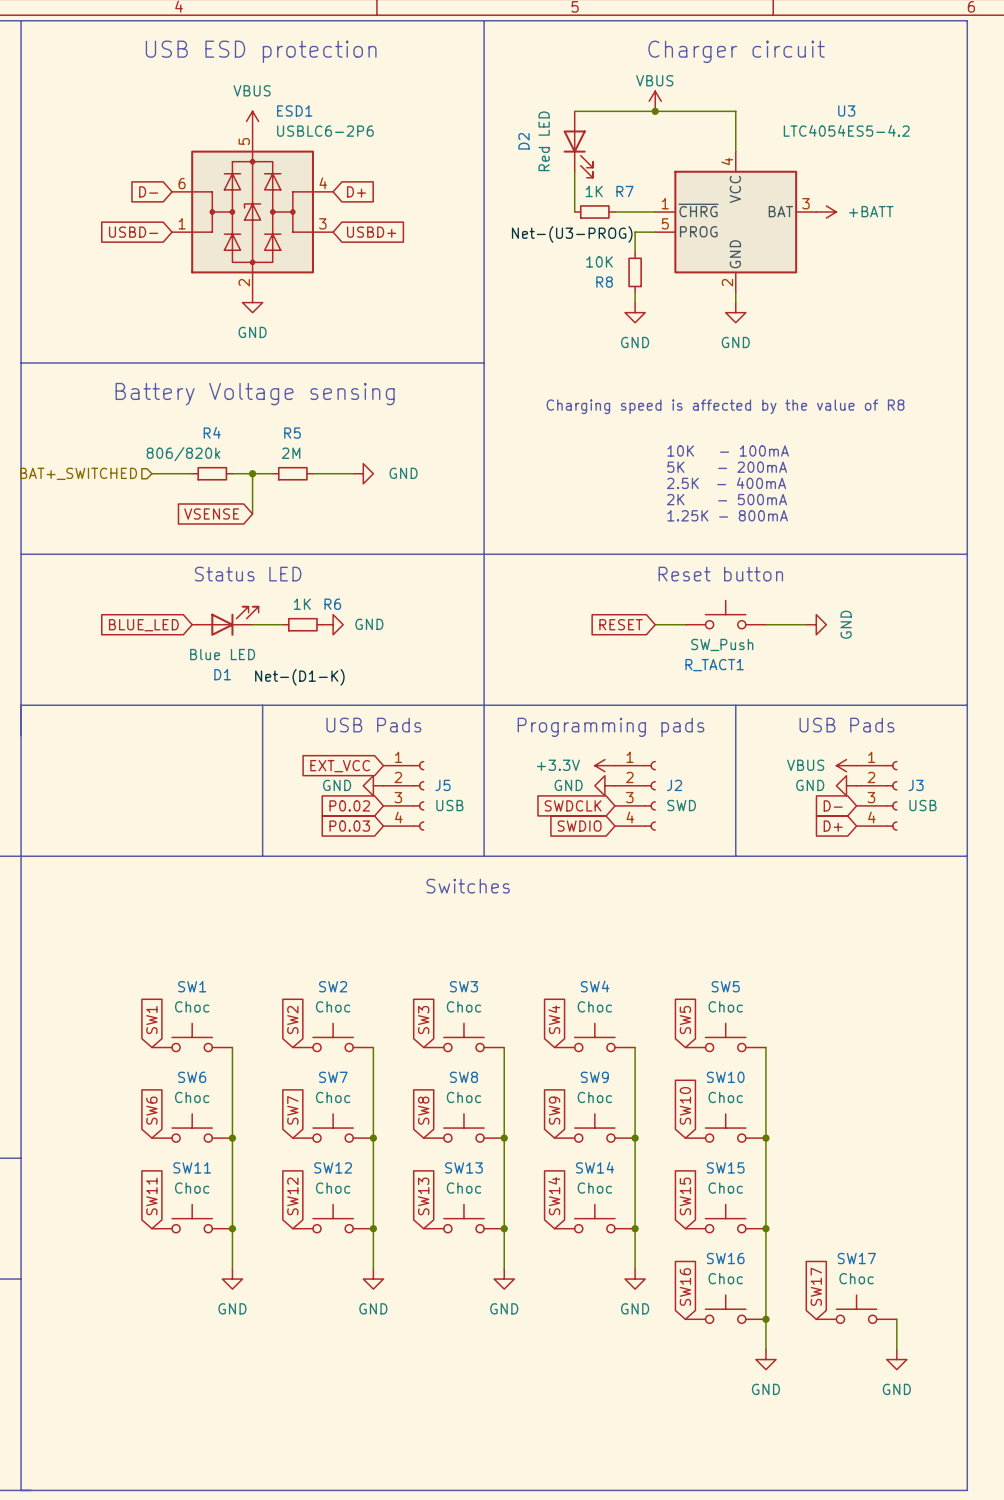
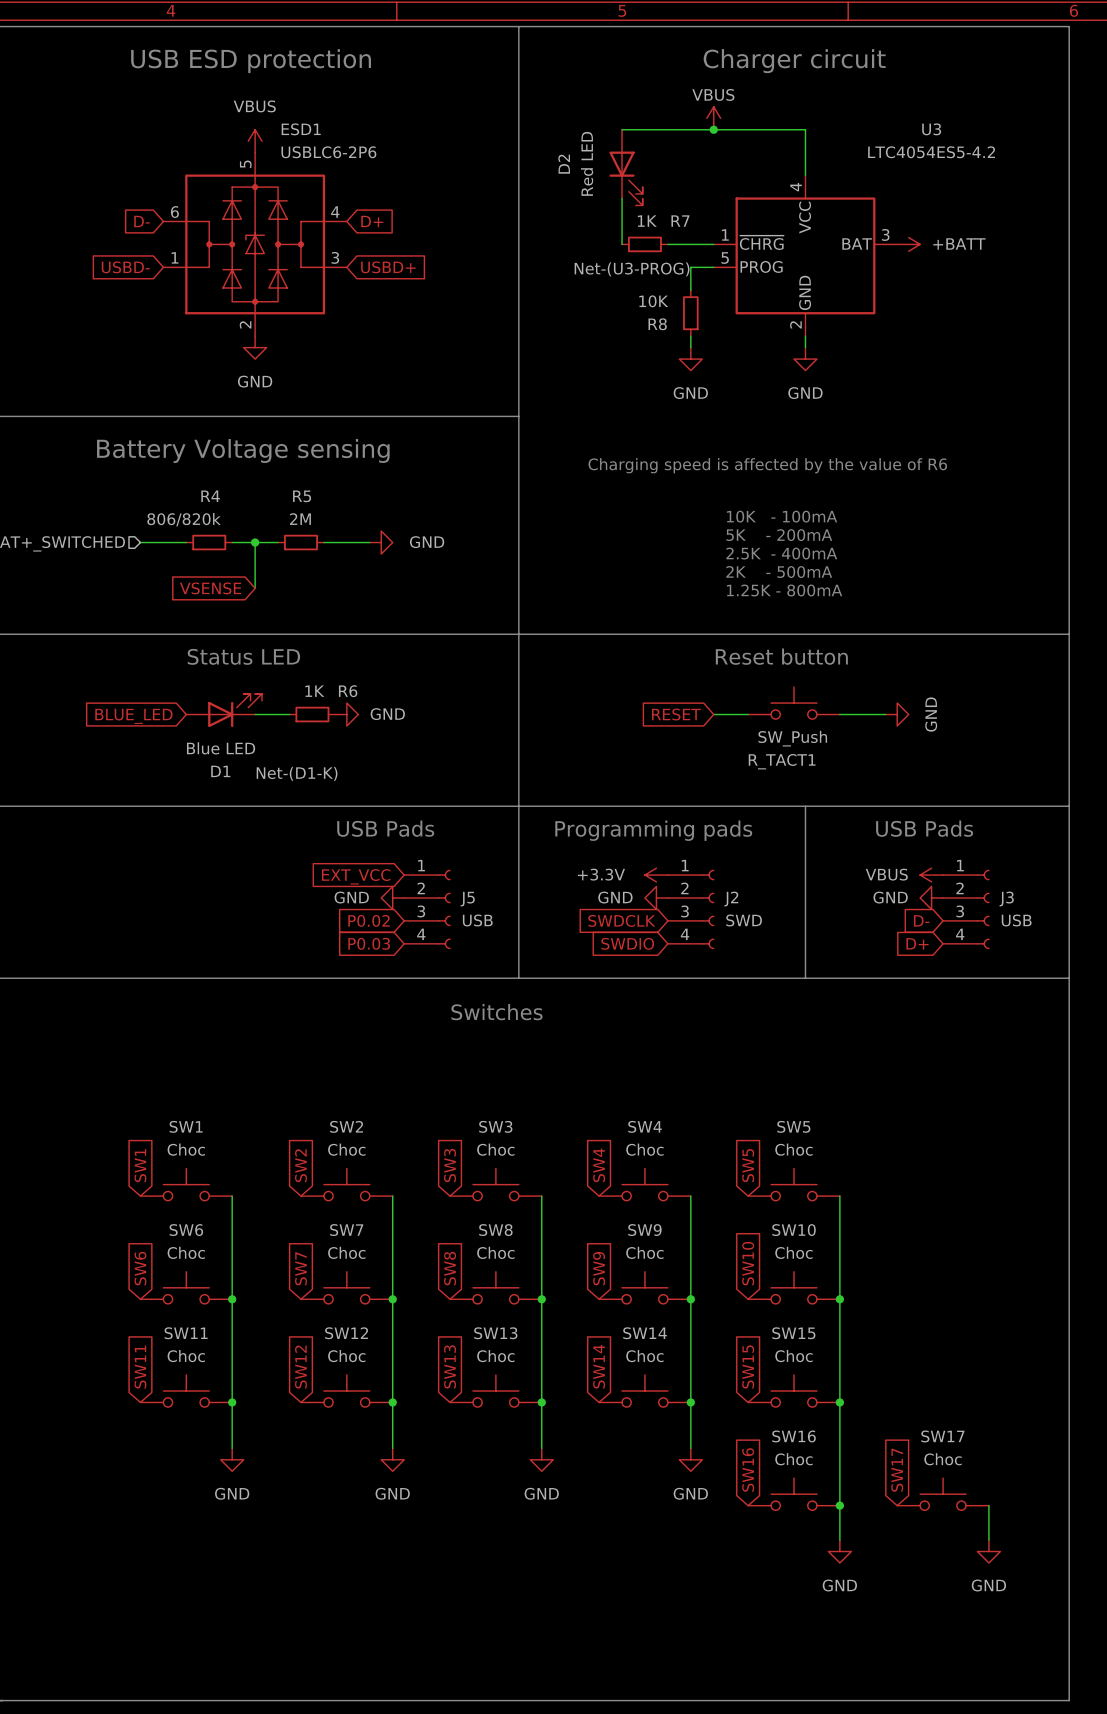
text: Charging speed is affected by the value of R8 (725, 406) -> Charging speed is affected by the value of R6 (767, 465)
line: (262, 705) (262, 856) -> none

